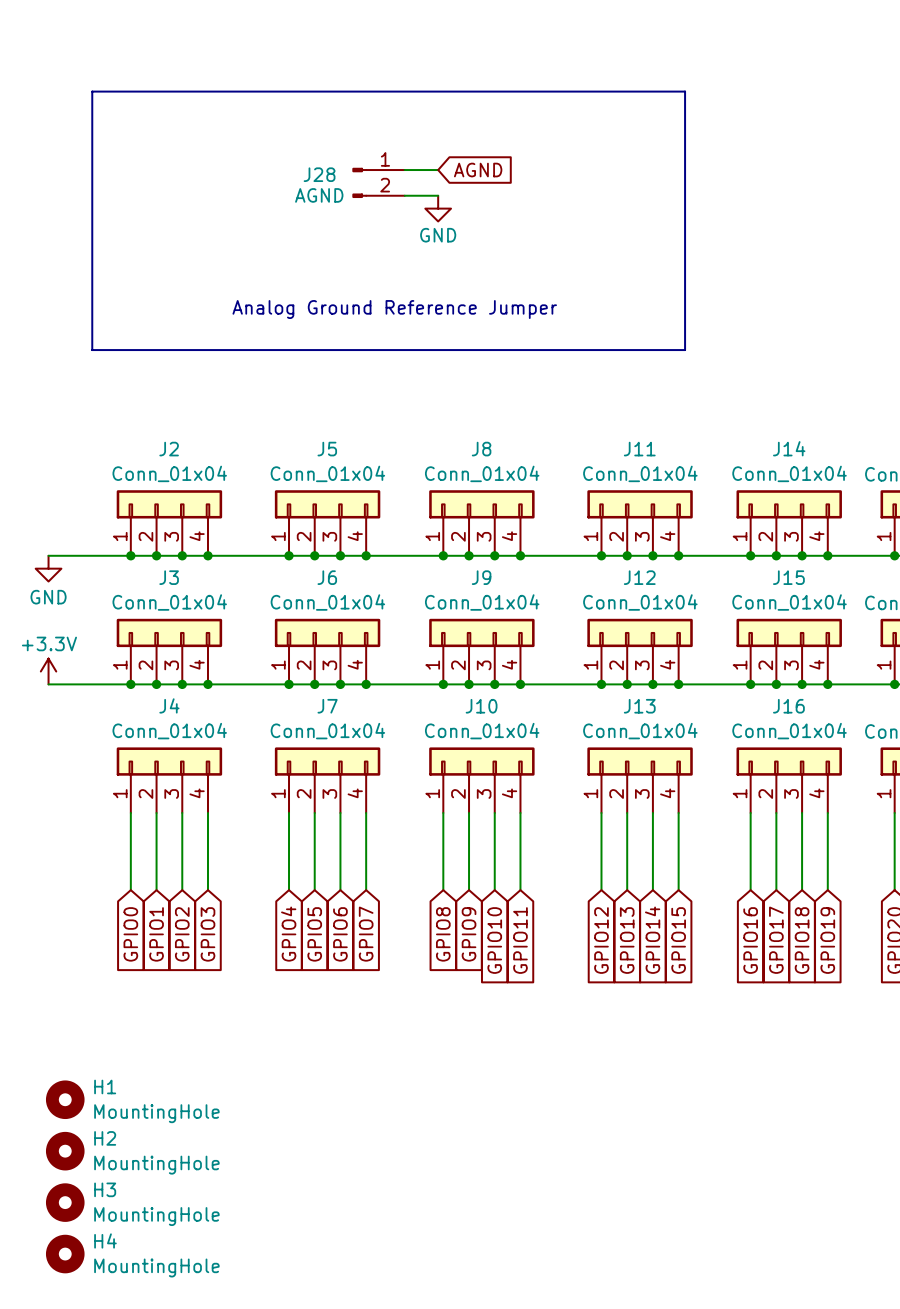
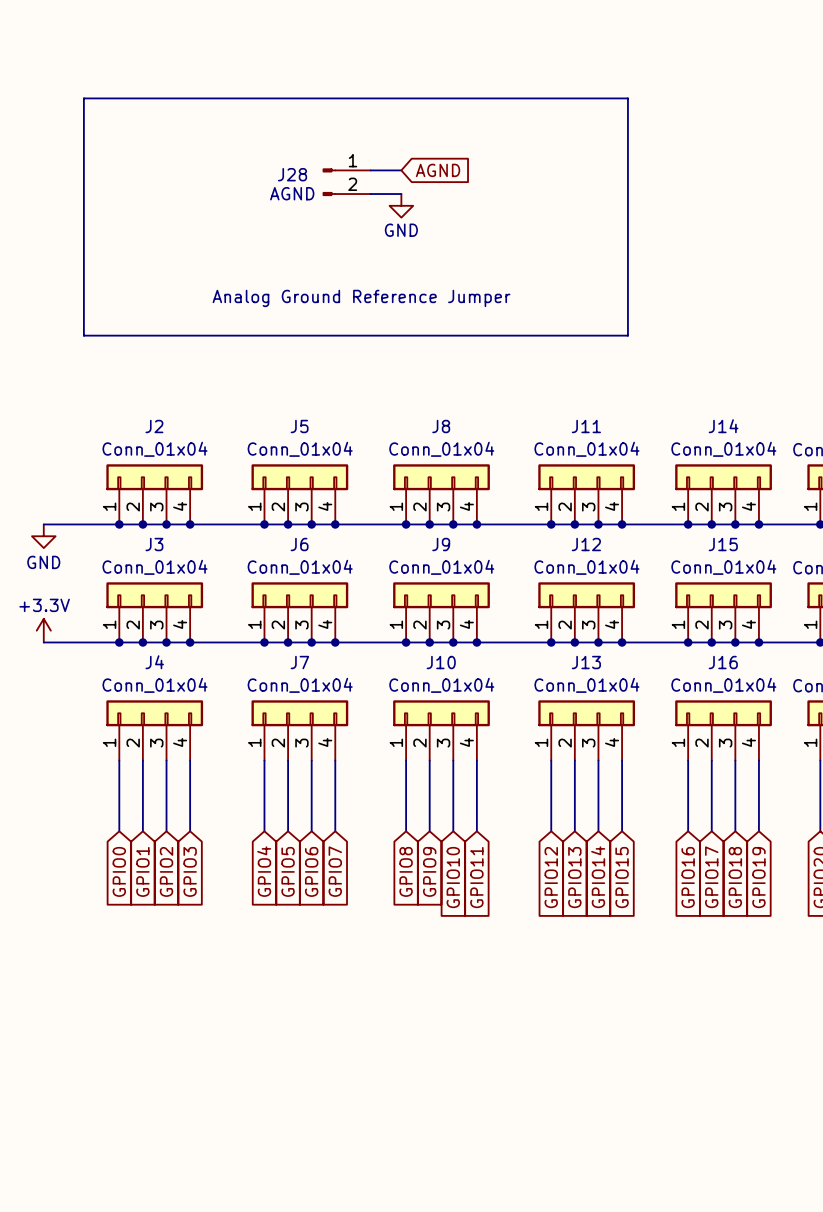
H1: MountingHole (65, 1099) -> none
H2: MountingHole (65, 1151) -> none
H3: MountingHole (65, 1202) -> none
H4: MountingHole (65, 1254) -> none

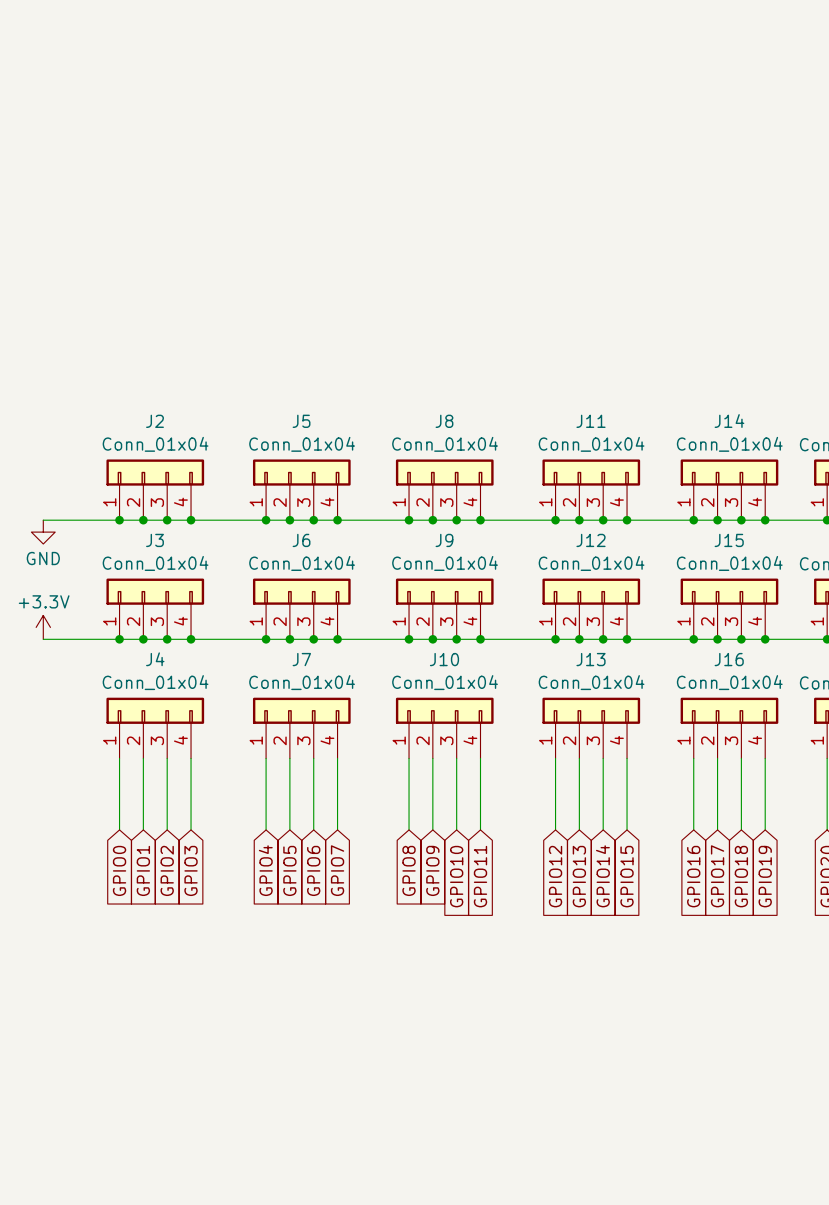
line: (83, 98) (83, 335) (627, 335) (627, 98) (83, 98) -> none
wire: (370, 170) (401, 170) -> none
global label: AGND (438, 170) -> none
J28: AGND (346, 182) -> none
wire: (370, 194) (401, 194) -> none
power symbol: GND (401, 205) -> none
text: Analog Ground Reference Jumper (361, 298) -> none

